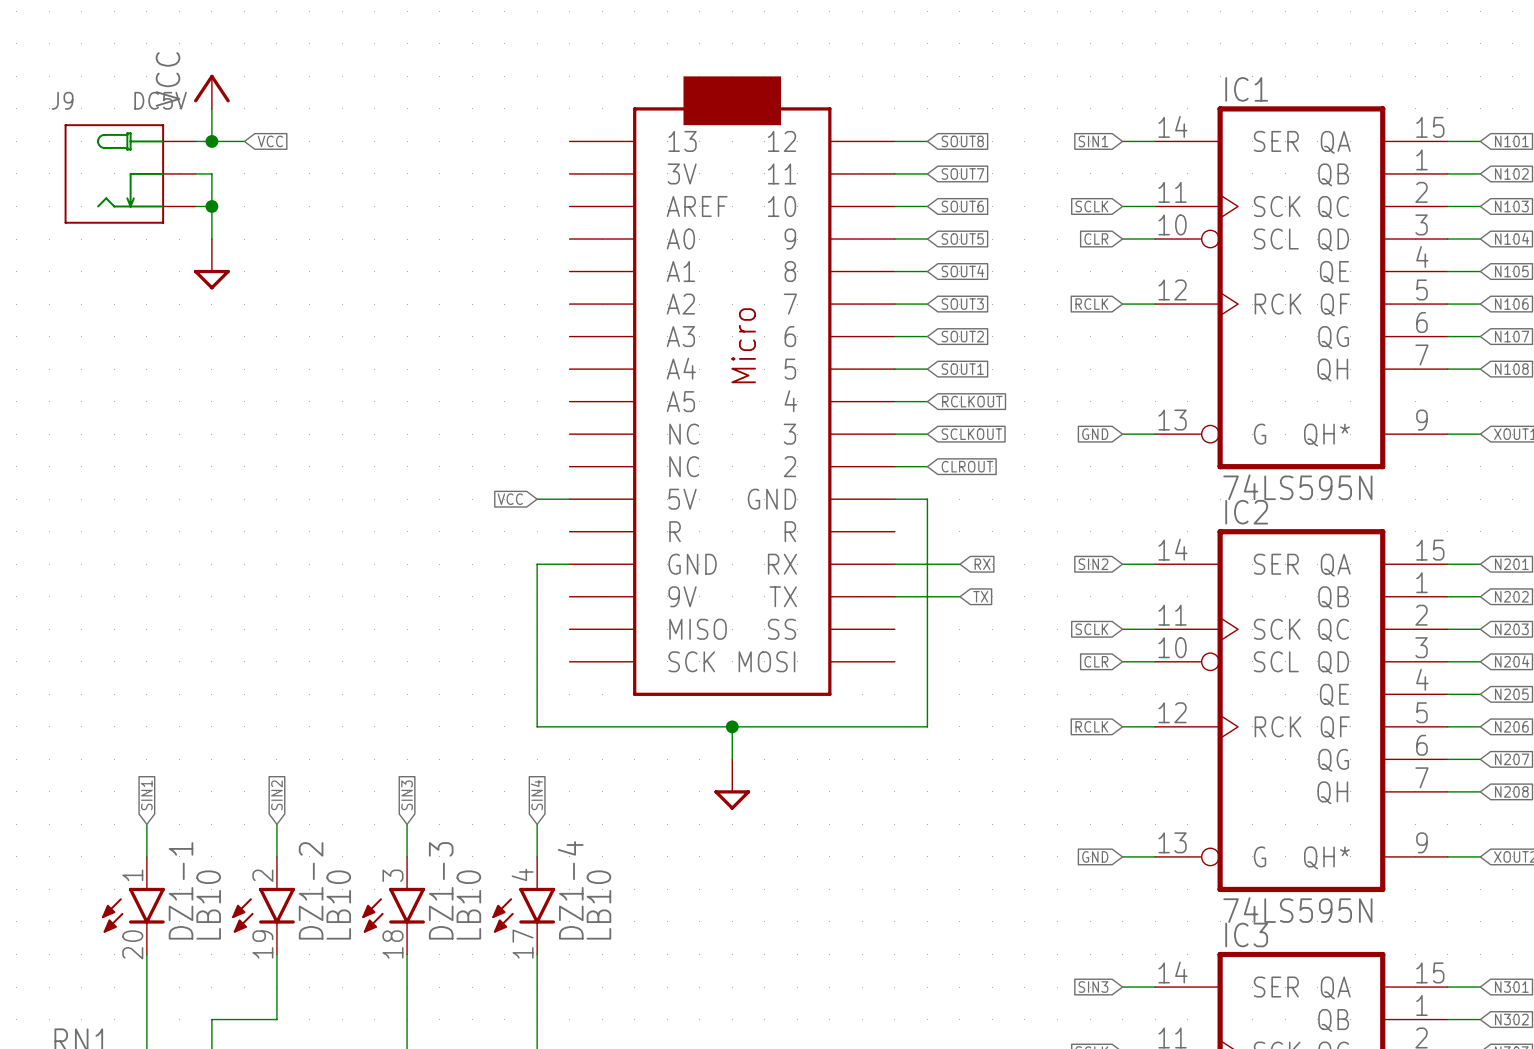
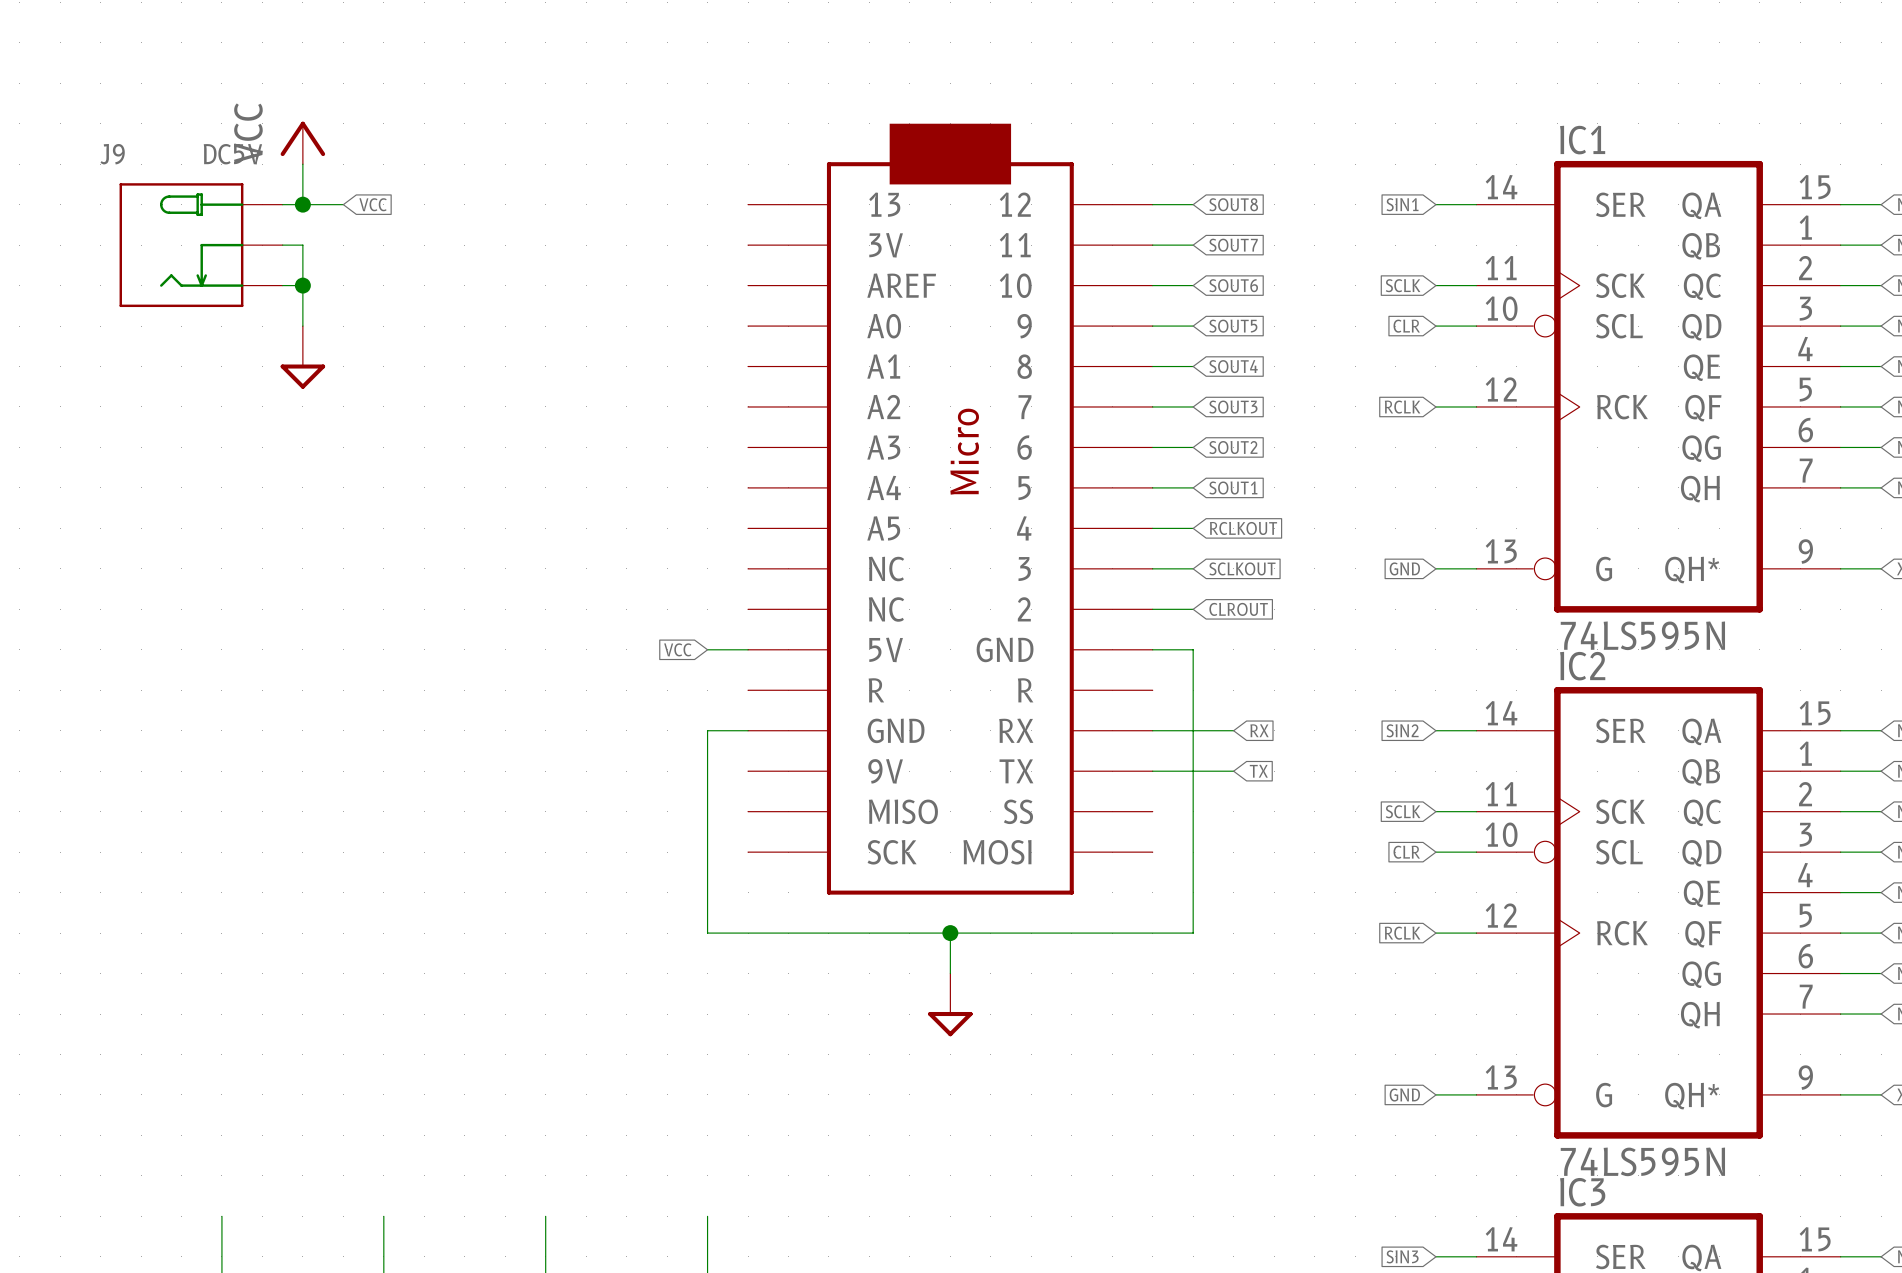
global label: SIN1 (146, 795) -> none
global label: SIN2 (276, 795) -> none
global label: SIN3 (407, 795) -> none
global label: SIN4 (536, 795) -> none
wire: (146, 824) (146, 856) -> none
wire: (276, 824) (276, 856) -> none
wire: (407, 824) (407, 856) -> none
wire: (537, 824) (537, 856) -> none
DZ1-1: LB10 (133, 905) -> none
DZ1-2: LB10 (263, 905) -> none
DZ1-3: LB10 (393, 905) -> none
DZ1-4: LB10 (523, 905) -> none

